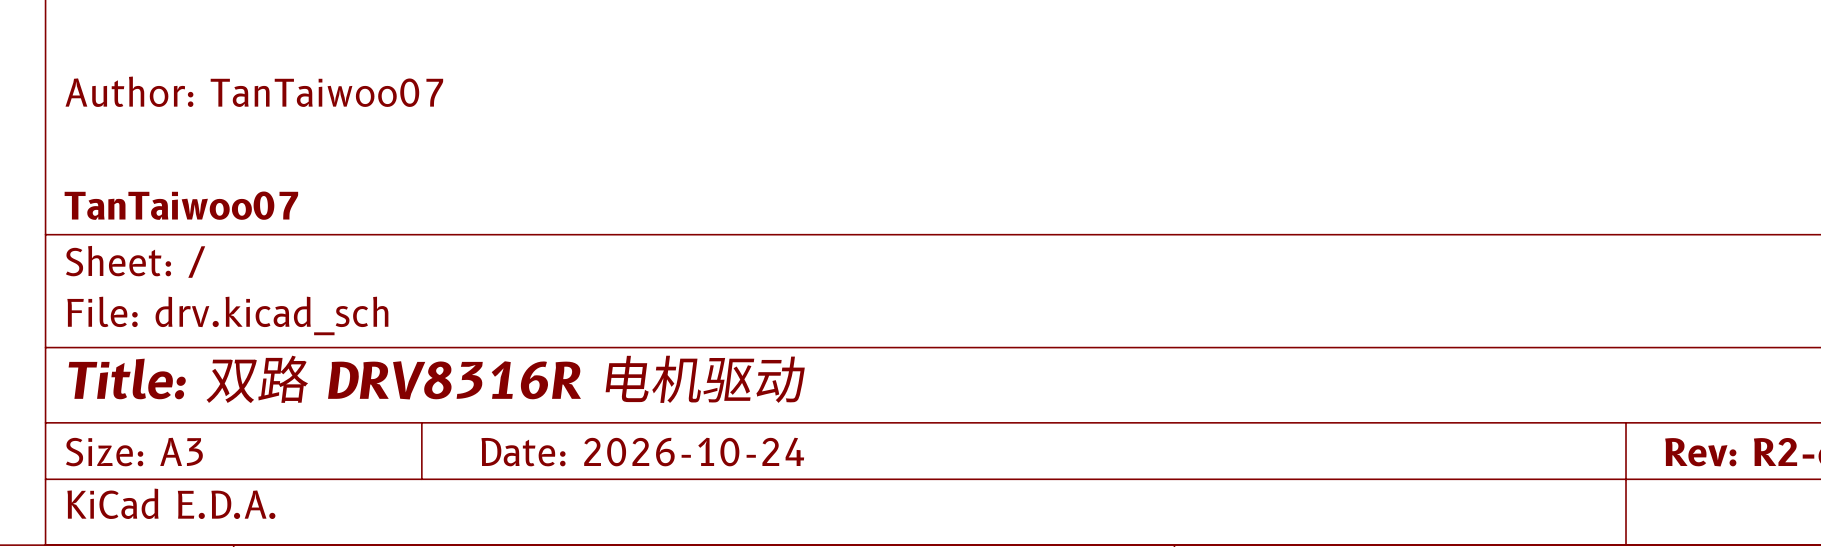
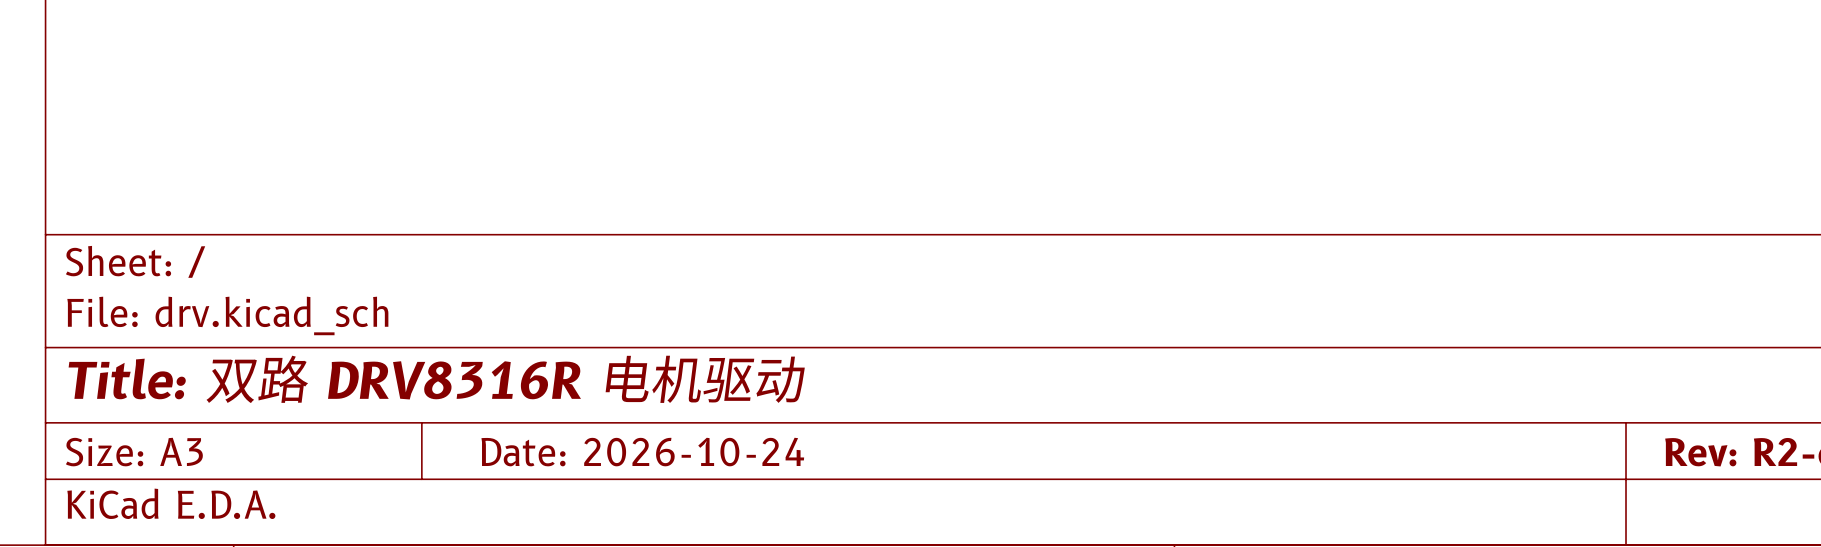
title block: Author: TanTaiwoo07 (254, 91) -> none
title block: TanTaiwoo07 (181, 205) -> none

